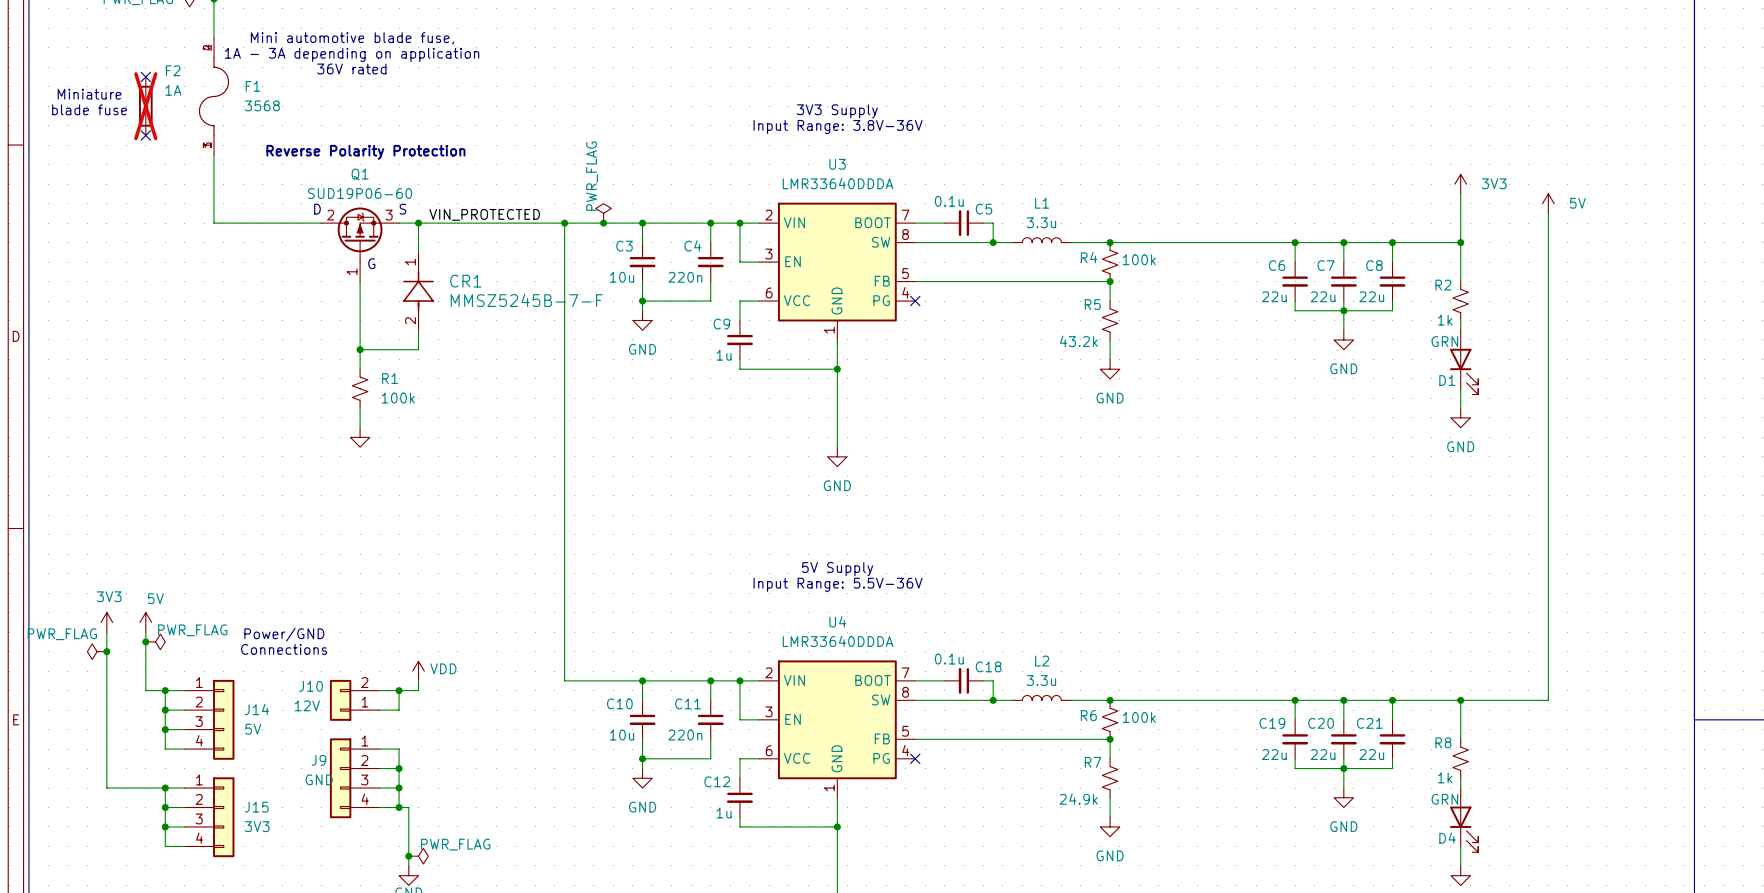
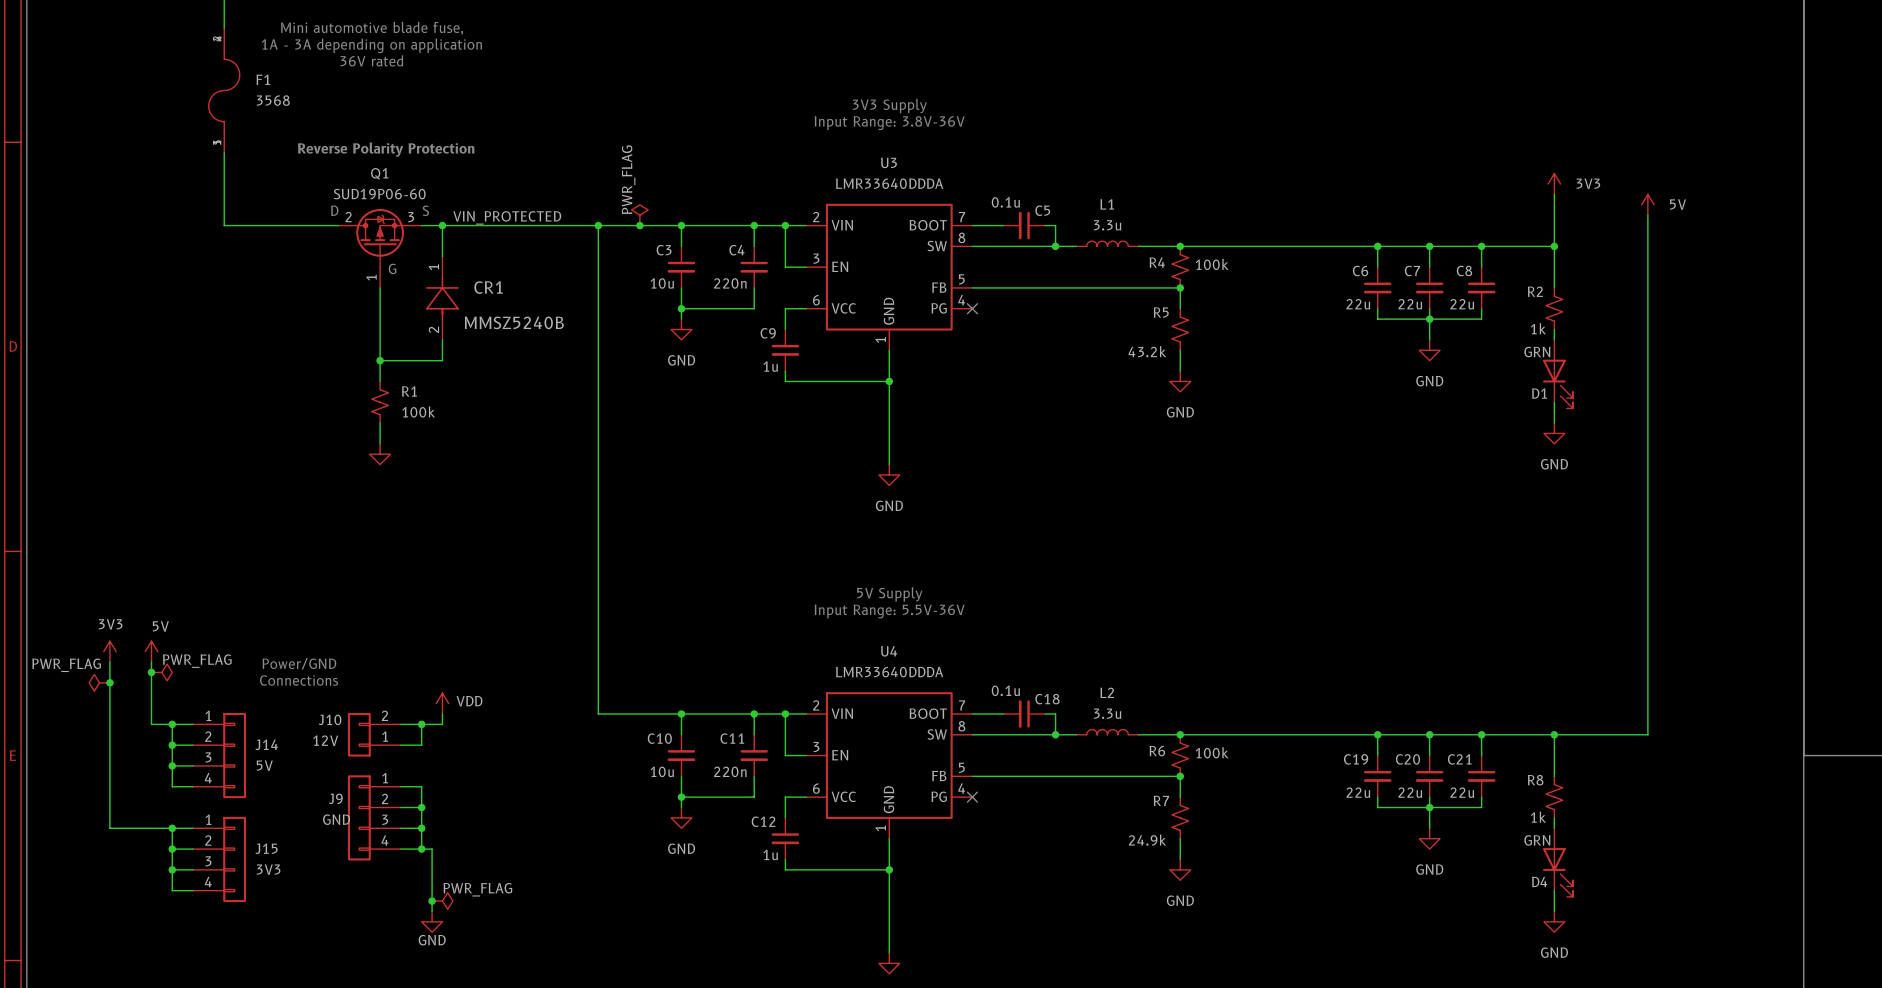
no-connect mark: (145, 77) -> none
text: Miniature (89, 94) -> none
F2: 1A (145, 106) -> none
text: blade fuse (89, 109) -> none
no-connect mark: (145, 135) -> none
CR1 value: MMSZ5245B-7-F (526, 300) -> MMSZ5240B (514, 322)

